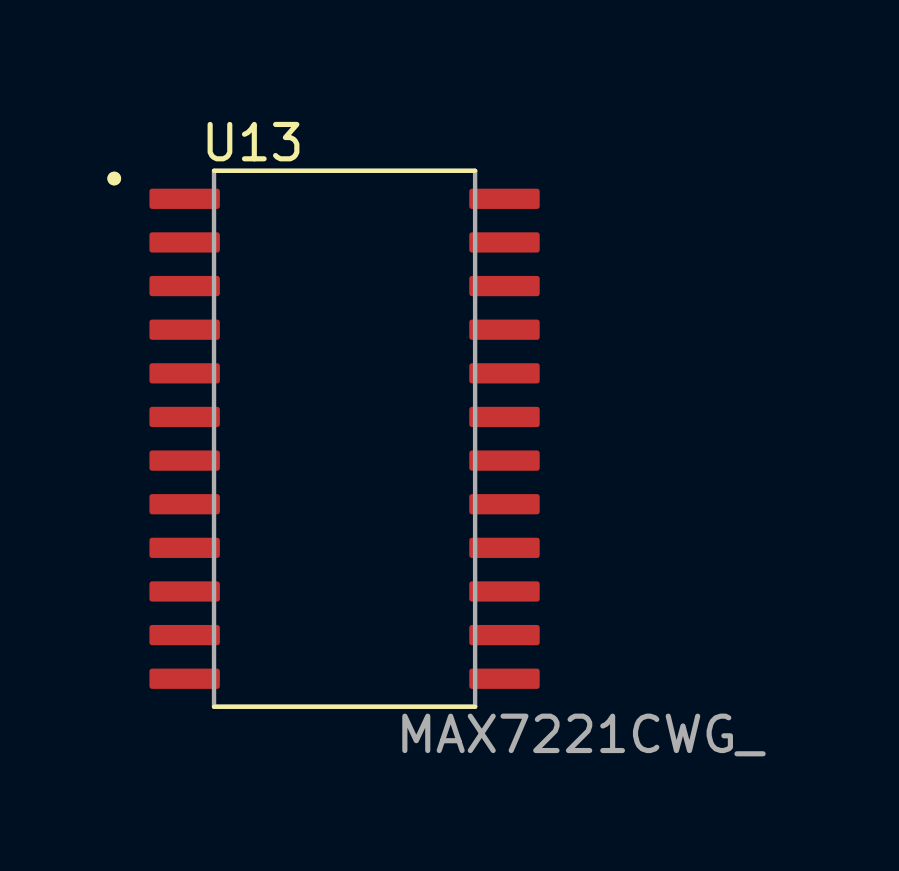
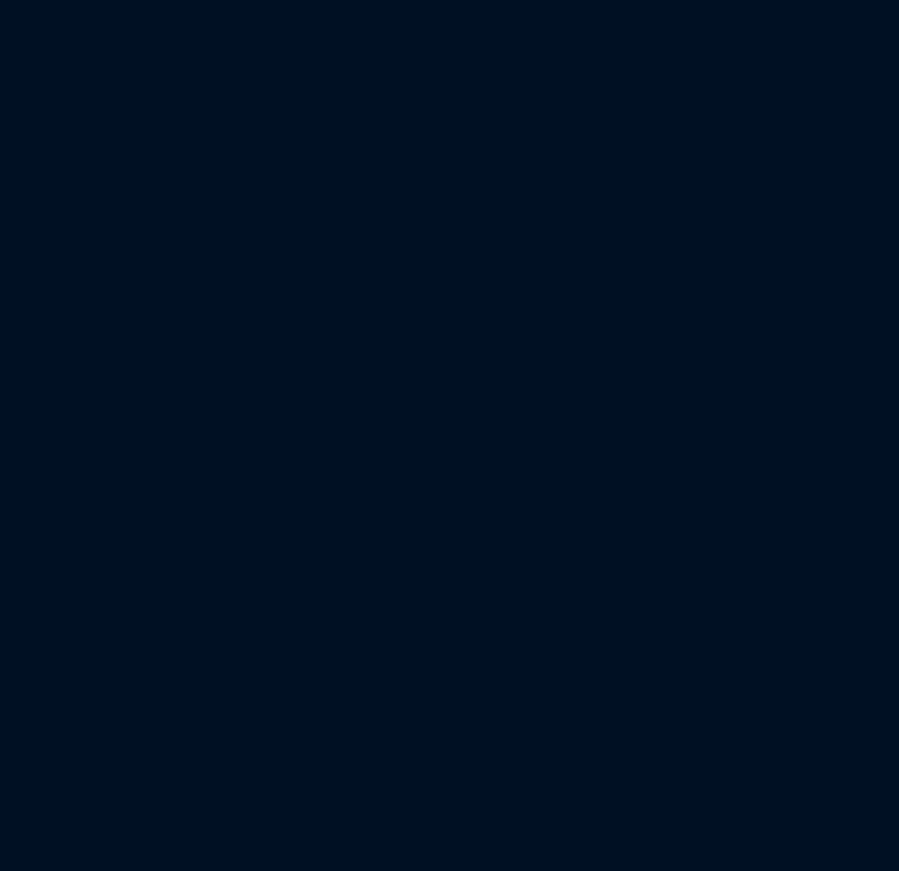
U13: MAX7221CWG_ (323, 438) -> none

